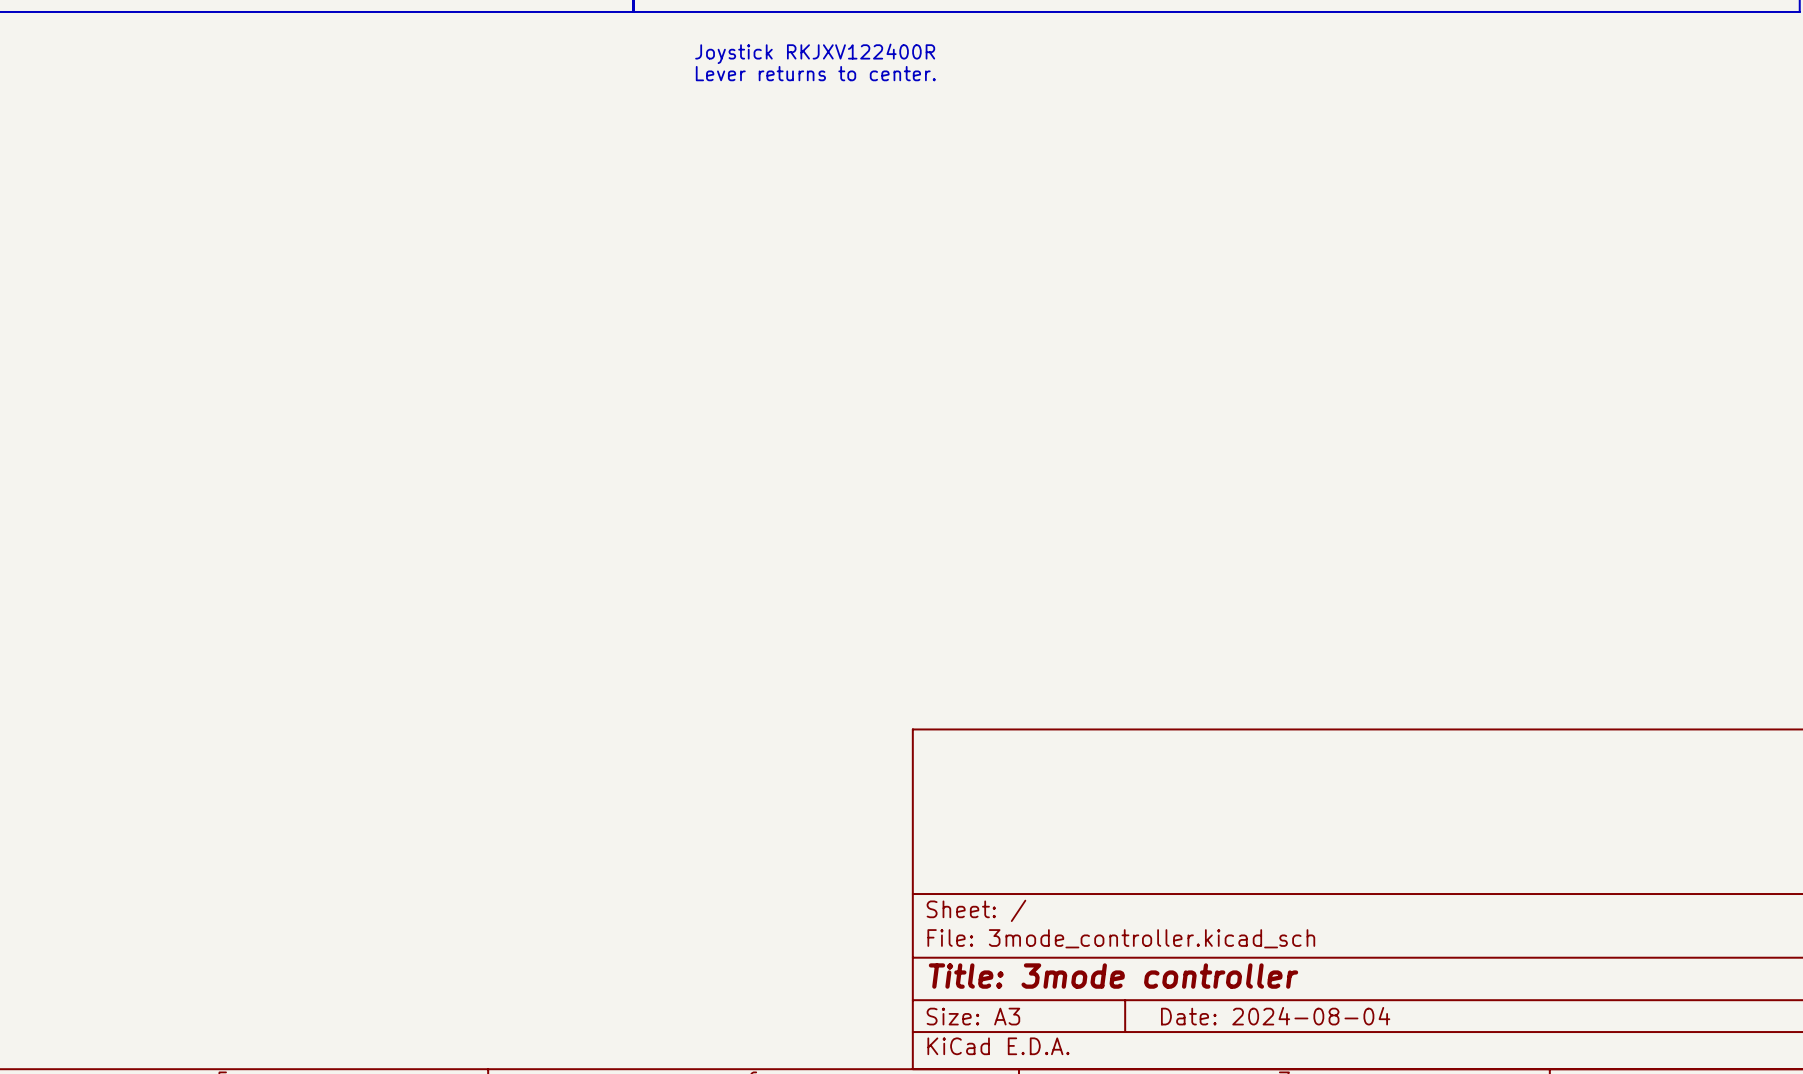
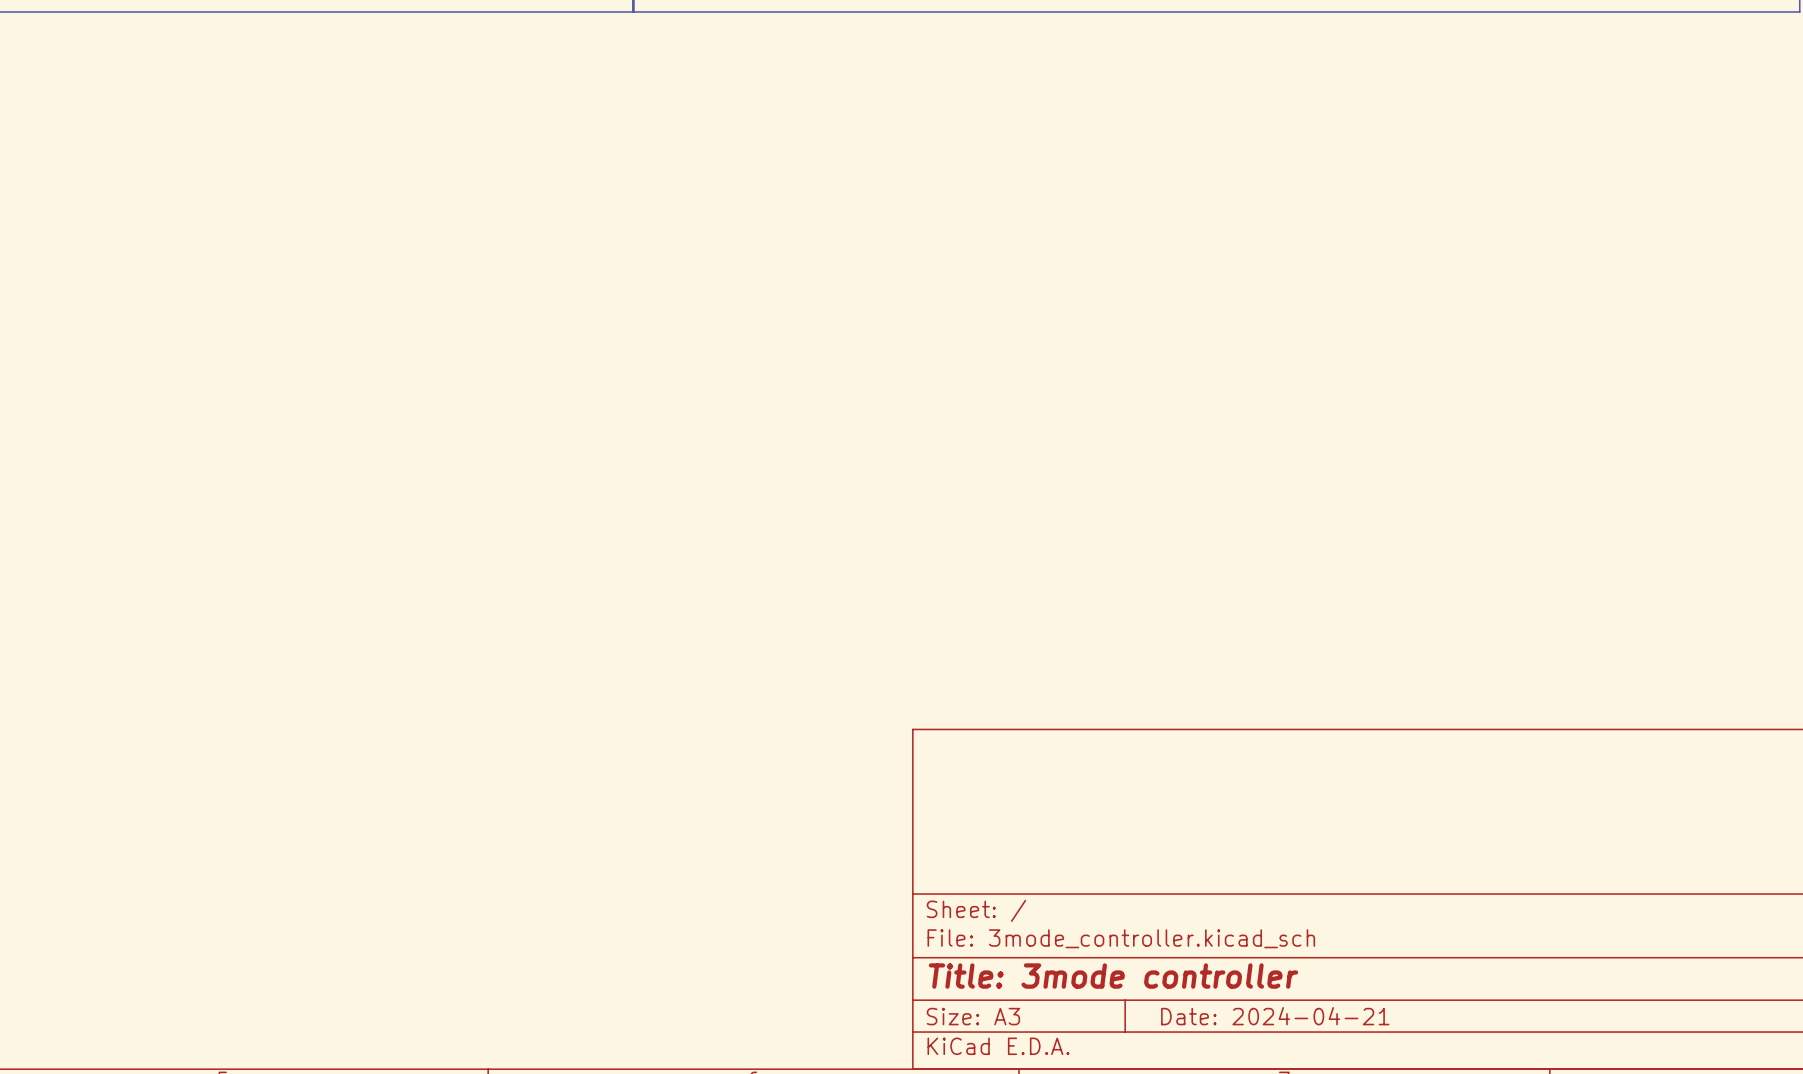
text: Joystick RKJXV122400R (815, 53) -> none
text: Lever returns to center. (815, 73) -> none
title block: Date: 2024-08-04 (1275, 1016) -> Date: 2024-04-21 (1275, 1016)

